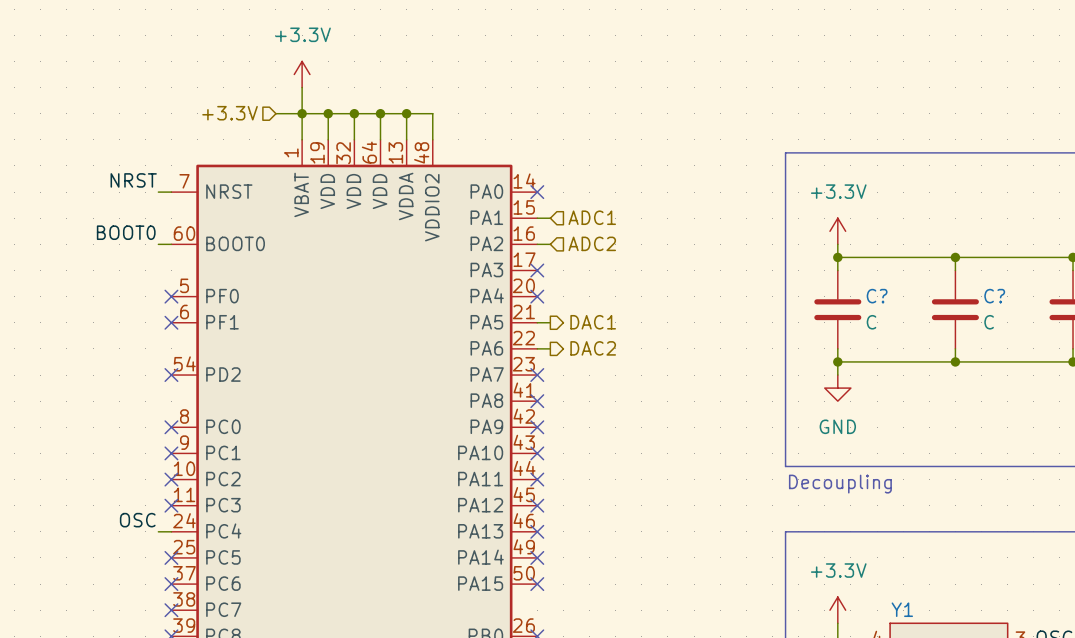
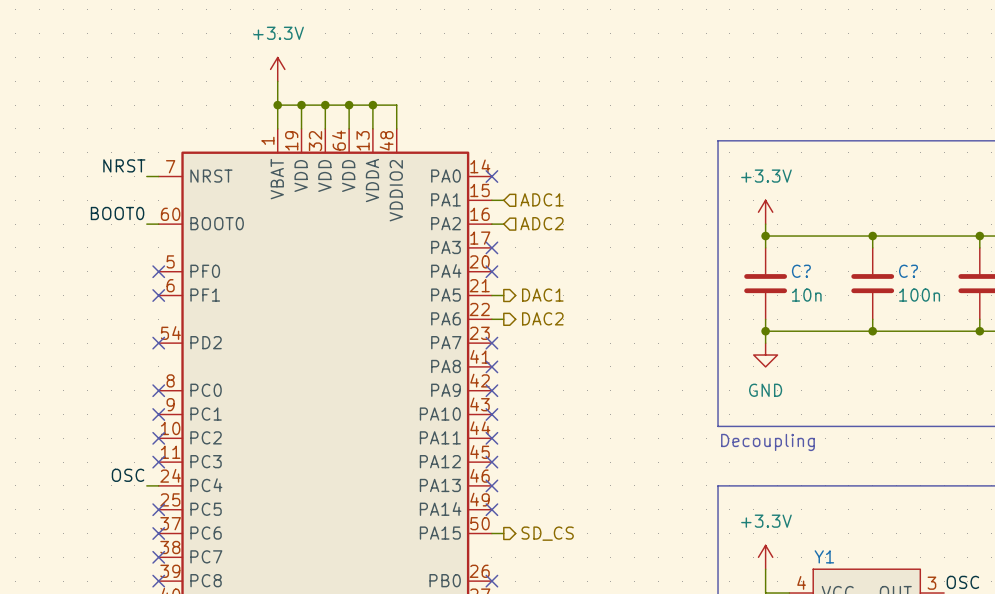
hierarchical label: +3.3V (230, 113) -> none
wire: (275, 113) (302, 113) -> none
C? value: C (871, 322) -> 10n (806, 295)
C? value: C (989, 322) -> 100n (919, 295)
wire: none -> (491, 533) (503, 533)
no-connect mark: (537, 584) -> none
hierarchical label: none -> SD_CS (547, 533)

